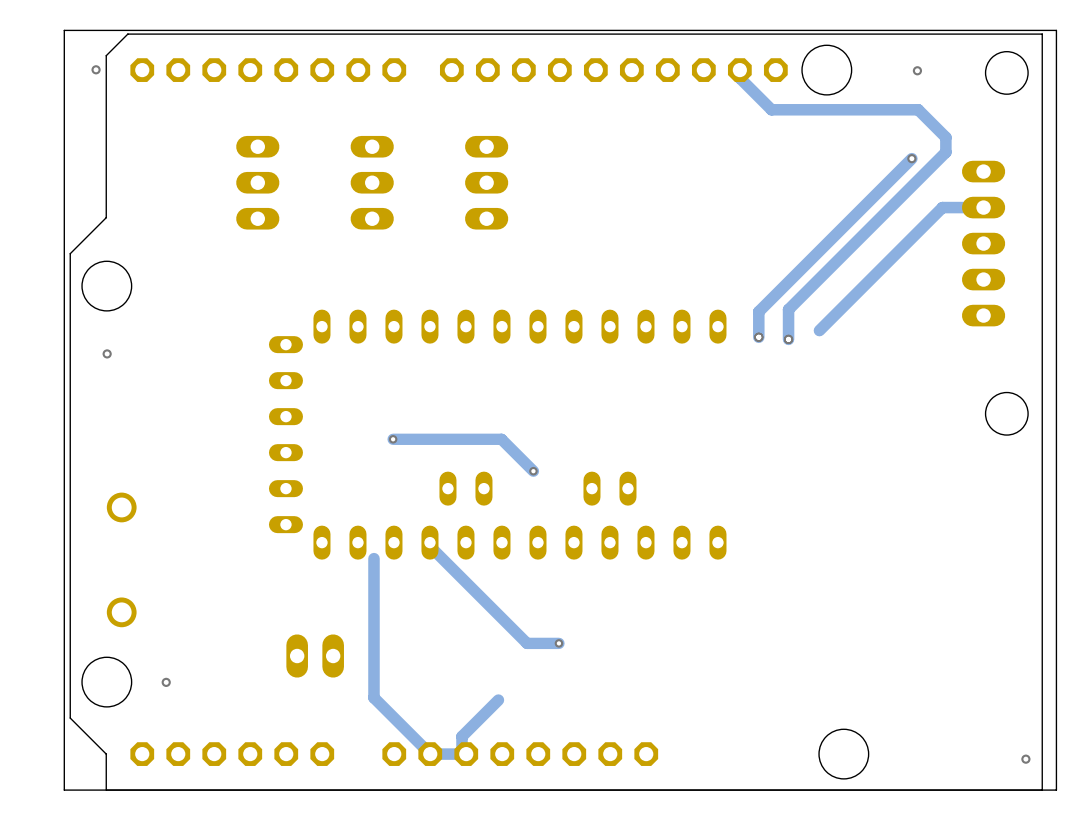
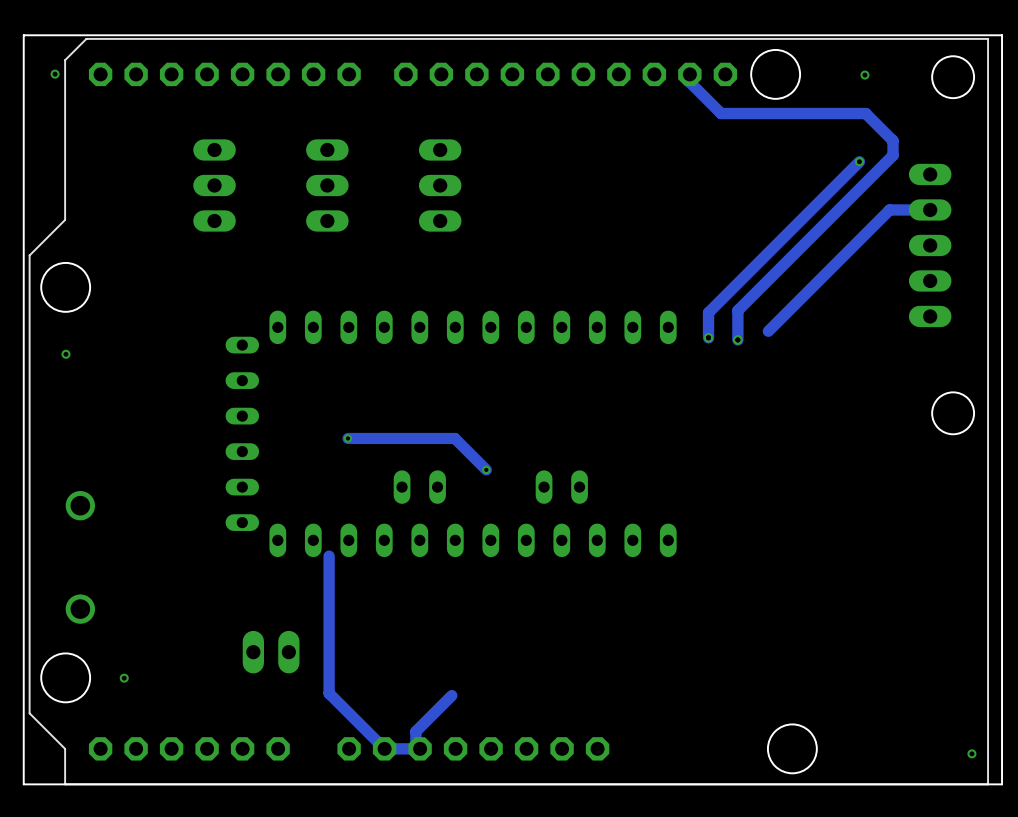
track: (429, 542) (431, 547) (527, 643) (558, 643) -> none
via: (558, 643) -> none

